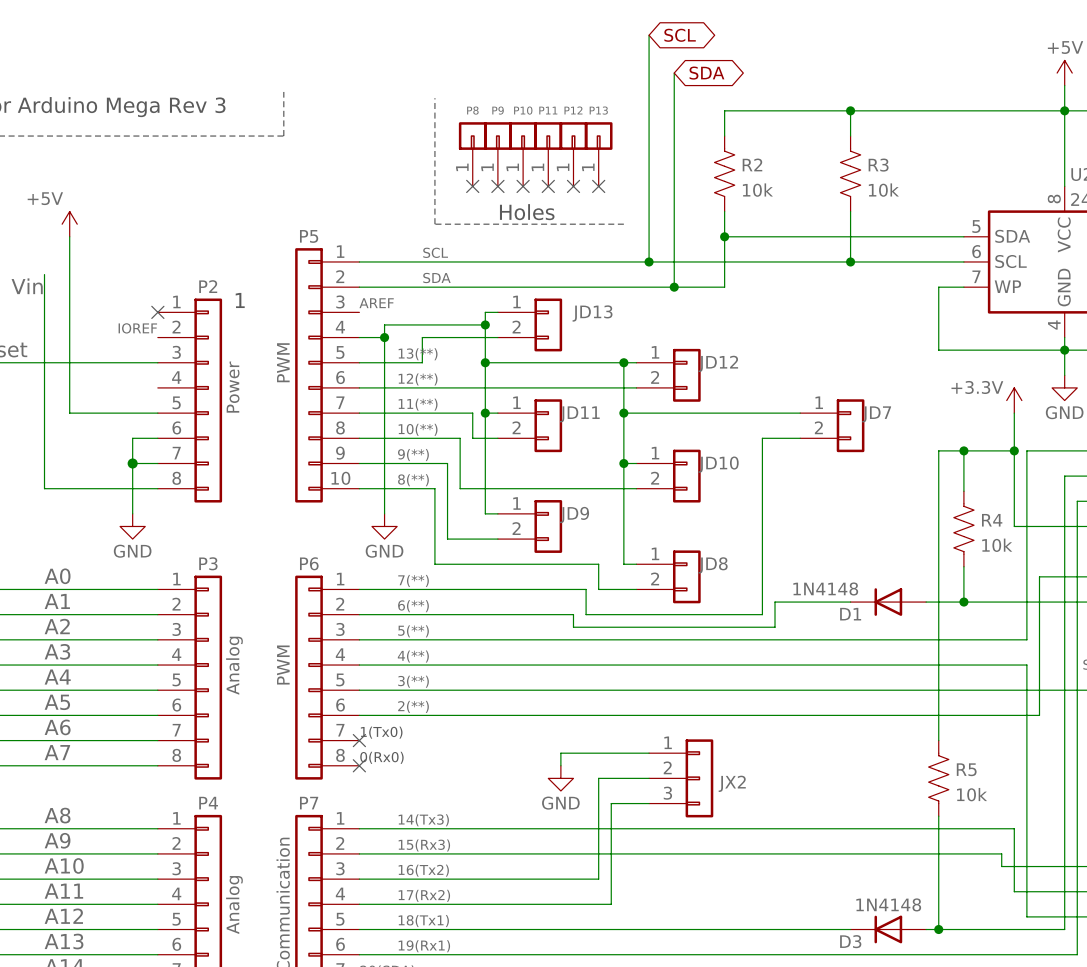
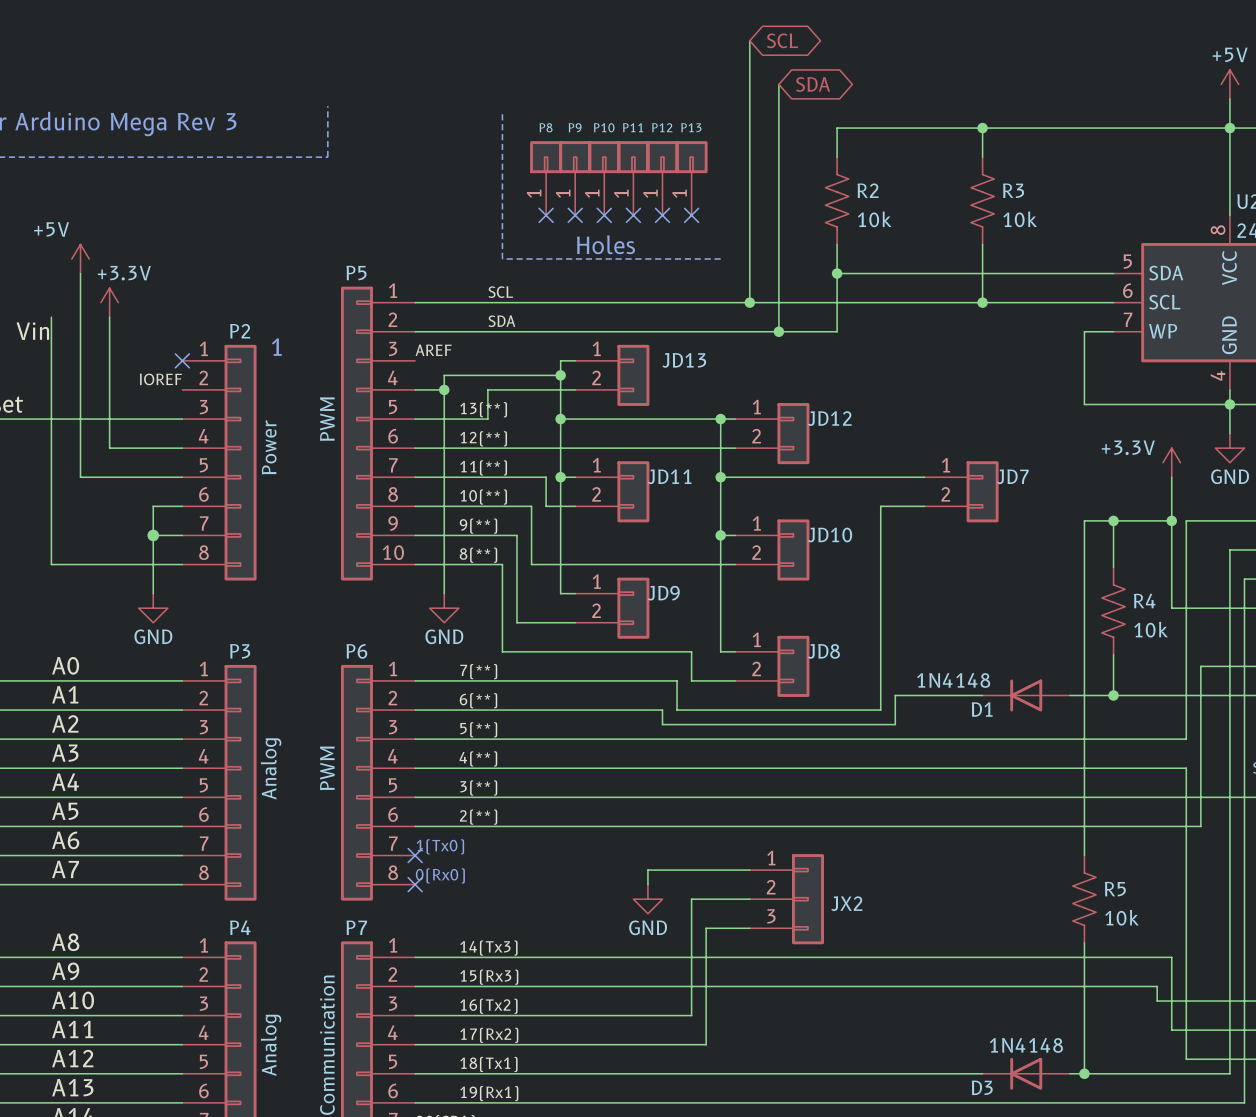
power symbol: none -> +3.3V (109, 302)
wire: none -> (109, 317) (109, 448) (182, 448)

